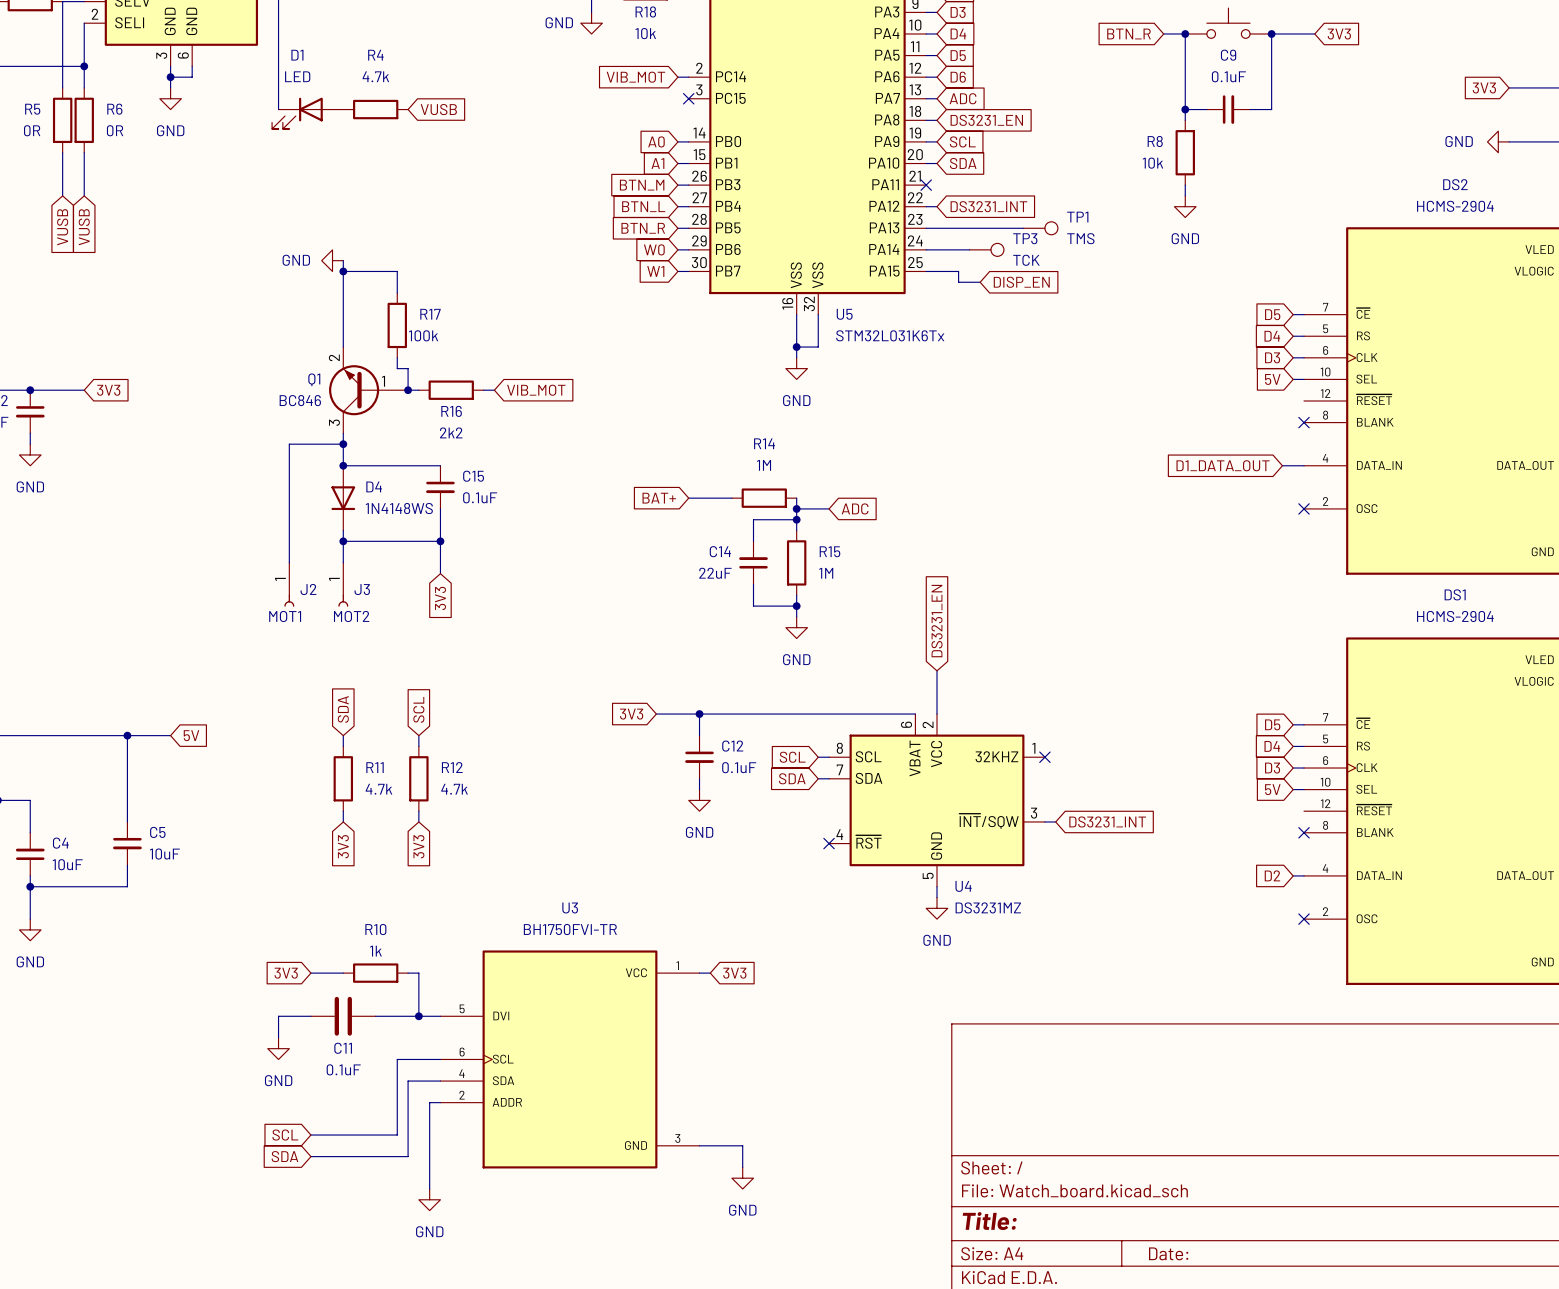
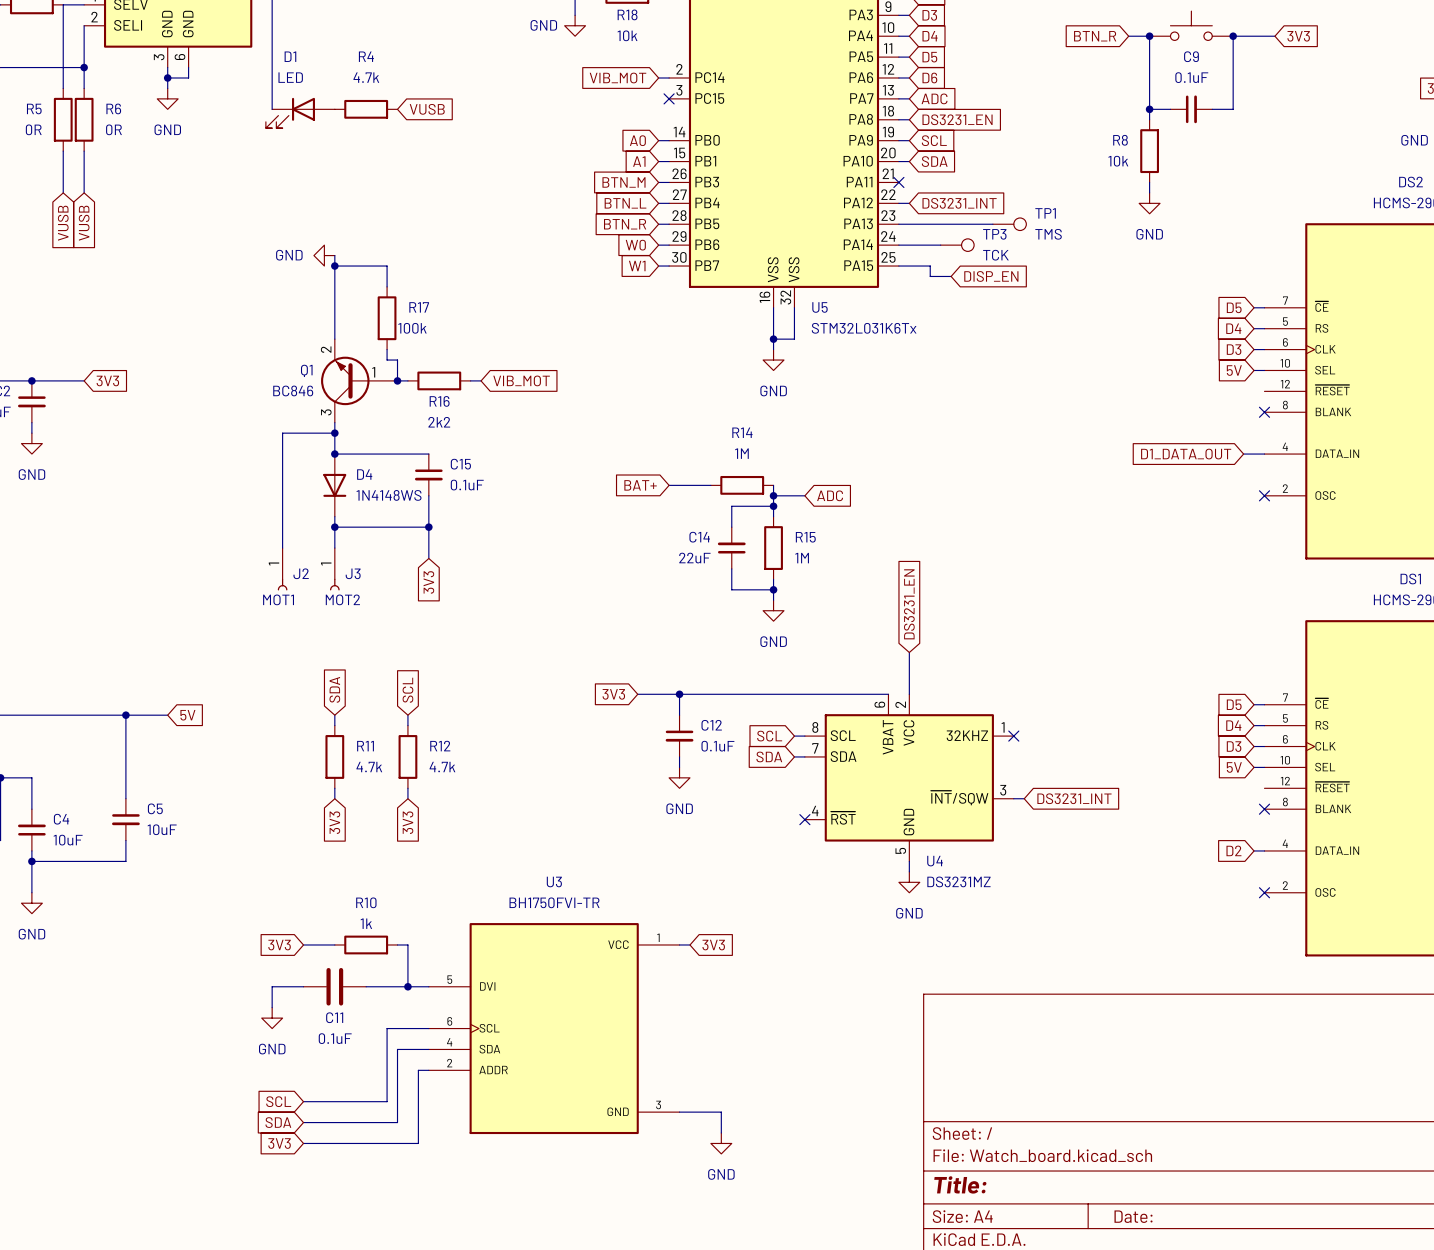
global label: none -> 3V3 (279, 1143)
wire: (429, 1178) (429, 1188) -> (418, 1143) (303, 1143)
power symbol: GND (429, 1199) -> none

